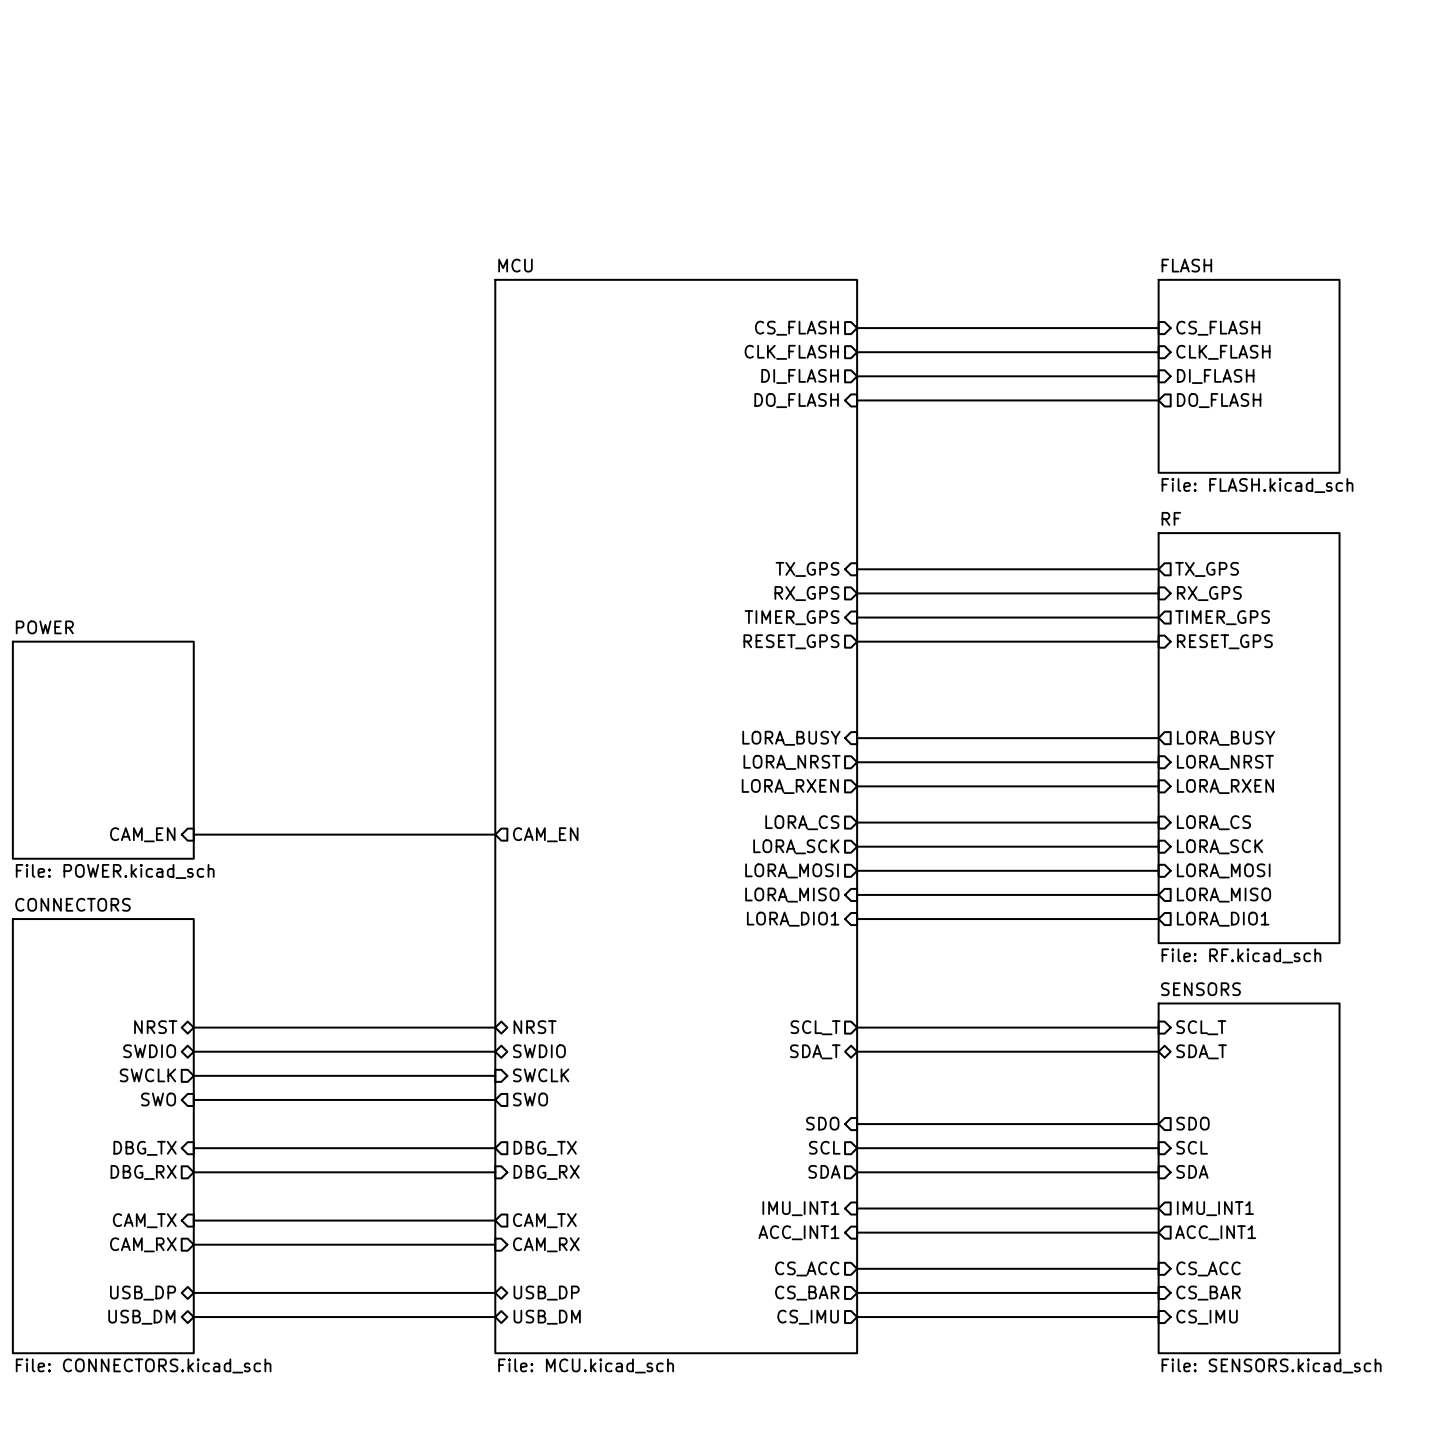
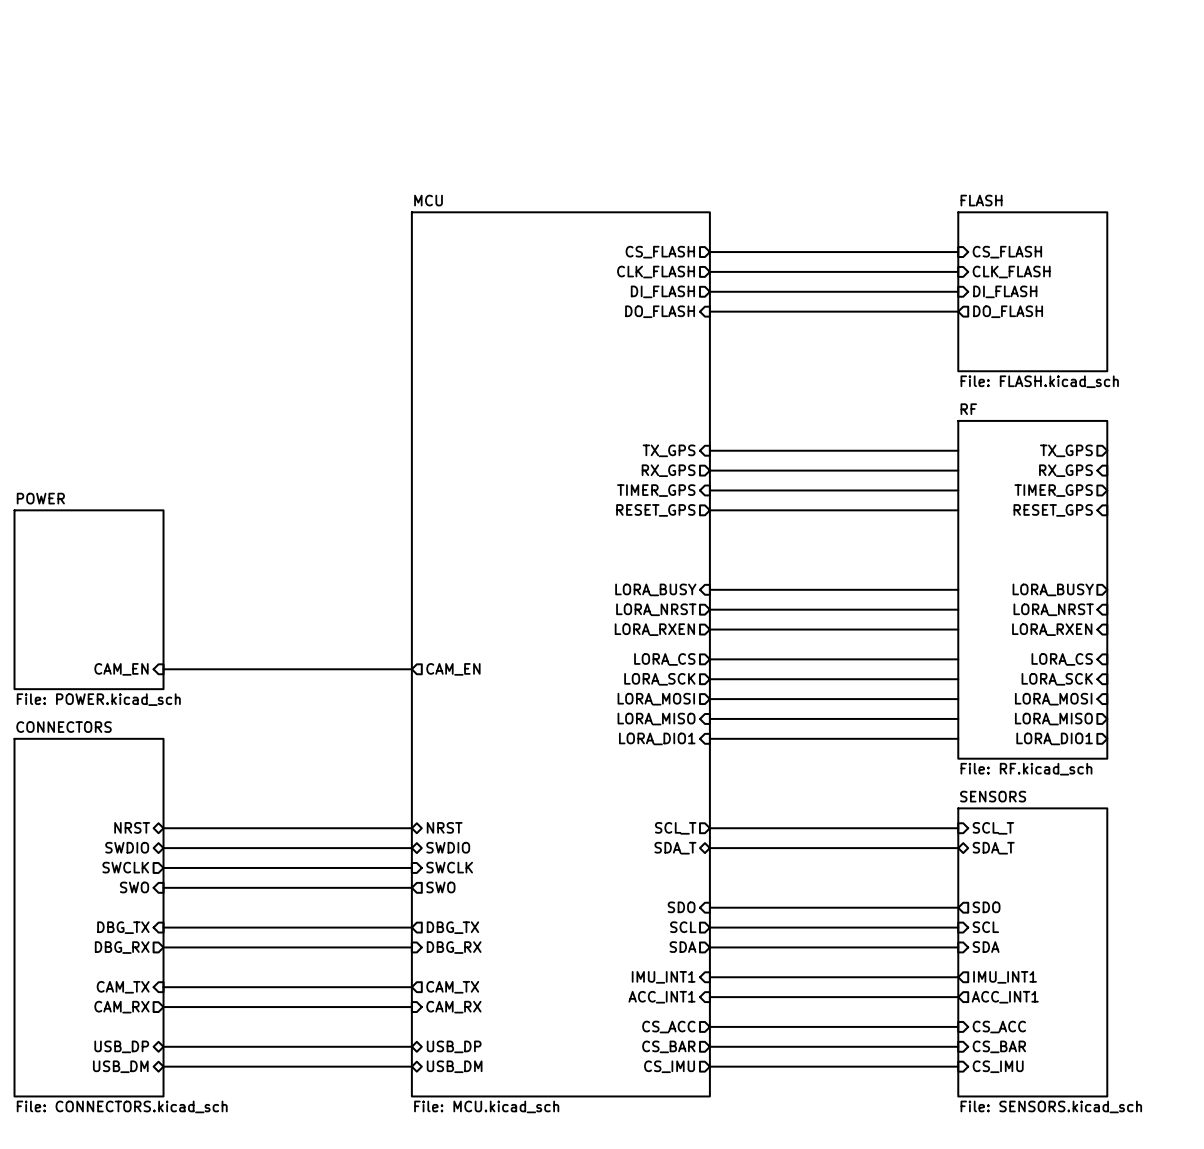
sheet pin rotation: 0° (1207, 569) -> 180° (1066, 450)
sheet pin rotation: 0° (1209, 593) -> 180° (1065, 470)
sheet pin rotation: 0° (1222, 617) -> 180° (1053, 490)
sheet pin rotation: 0° (1224, 641) -> 180° (1053, 510)
sheet pin rotation: 0° (1226, 738) -> 180° (1053, 589)
sheet pin rotation: 0° (1225, 762) -> 180° (1053, 609)
sheet pin rotation: 0° (1225, 786) -> 180° (1052, 629)
sheet pin rotation: 0° (1213, 822) -> 180° (1062, 659)
sheet pin rotation: 0° (1219, 846) -> 180° (1057, 679)
sheet pin rotation: 0° (1223, 870) -> 180° (1053, 699)
sheet pin rotation: 0° (1224, 895) -> 180° (1053, 719)
sheet pin rotation: 0° (1223, 919) -> 180° (1054, 738)

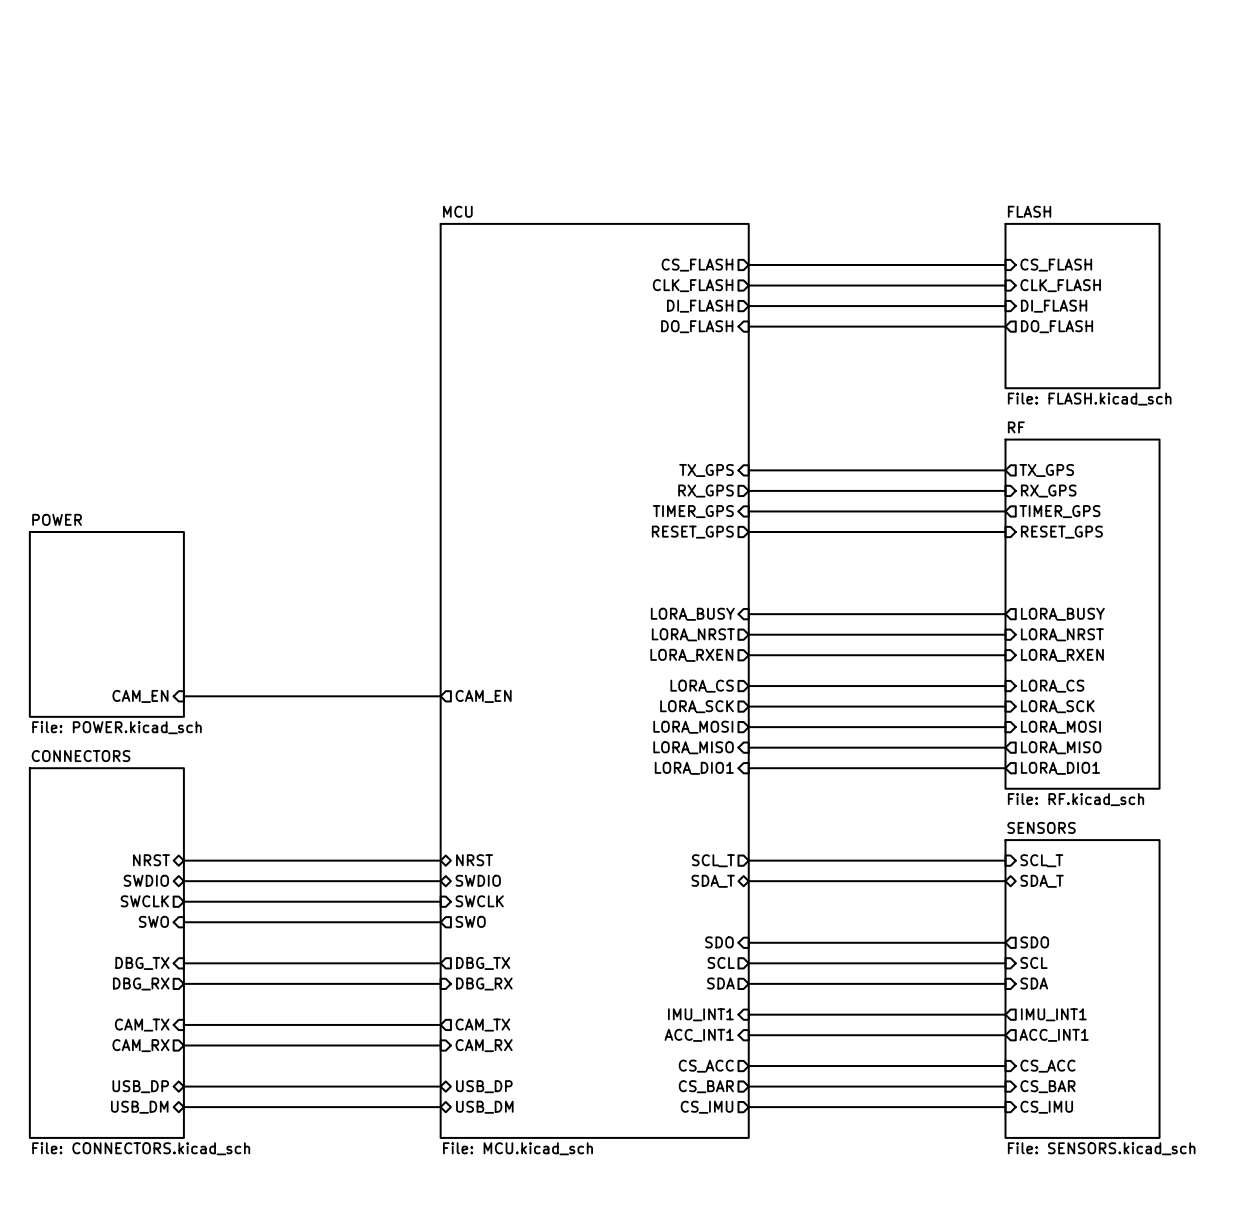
sheet pin rotation: 0° (1066, 450) -> 180° (1046, 470)
sheet pin rotation: 0° (1065, 470) -> 180° (1048, 491)
sheet pin rotation: 0° (1053, 490) -> 180° (1059, 511)
sheet pin rotation: 0° (1053, 510) -> 180° (1061, 532)
sheet pin rotation: 0° (1053, 589) -> 180° (1062, 614)
sheet pin rotation: 0° (1053, 609) -> 180° (1062, 634)
sheet pin rotation: 0° (1052, 629) -> 180° (1062, 655)
sheet pin rotation: 0° (1062, 659) -> 180° (1052, 686)
sheet pin rotation: 0° (1057, 679) -> 180° (1057, 706)
sheet pin rotation: 0° (1053, 699) -> 180° (1060, 727)
sheet pin rotation: 0° (1053, 719) -> 180° (1061, 747)
sheet pin rotation: 0° (1054, 738) -> 180° (1060, 768)

